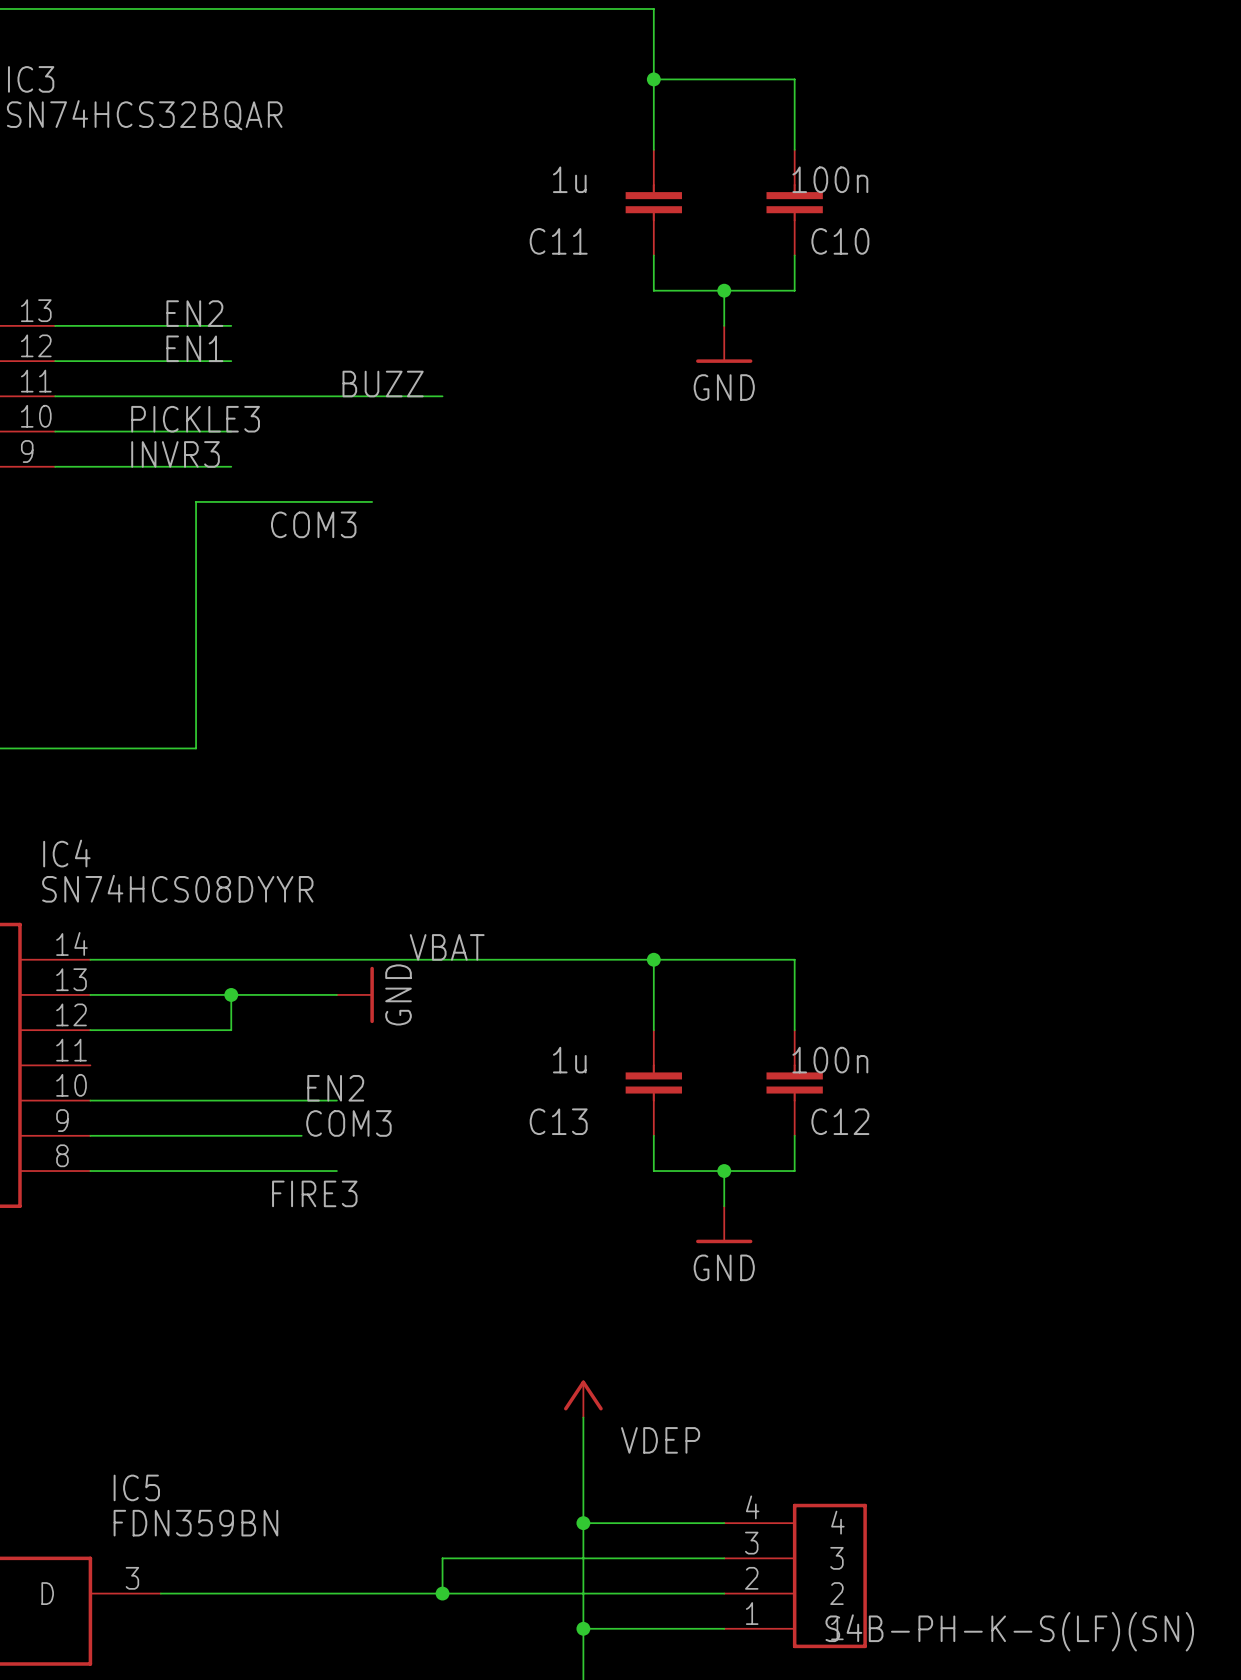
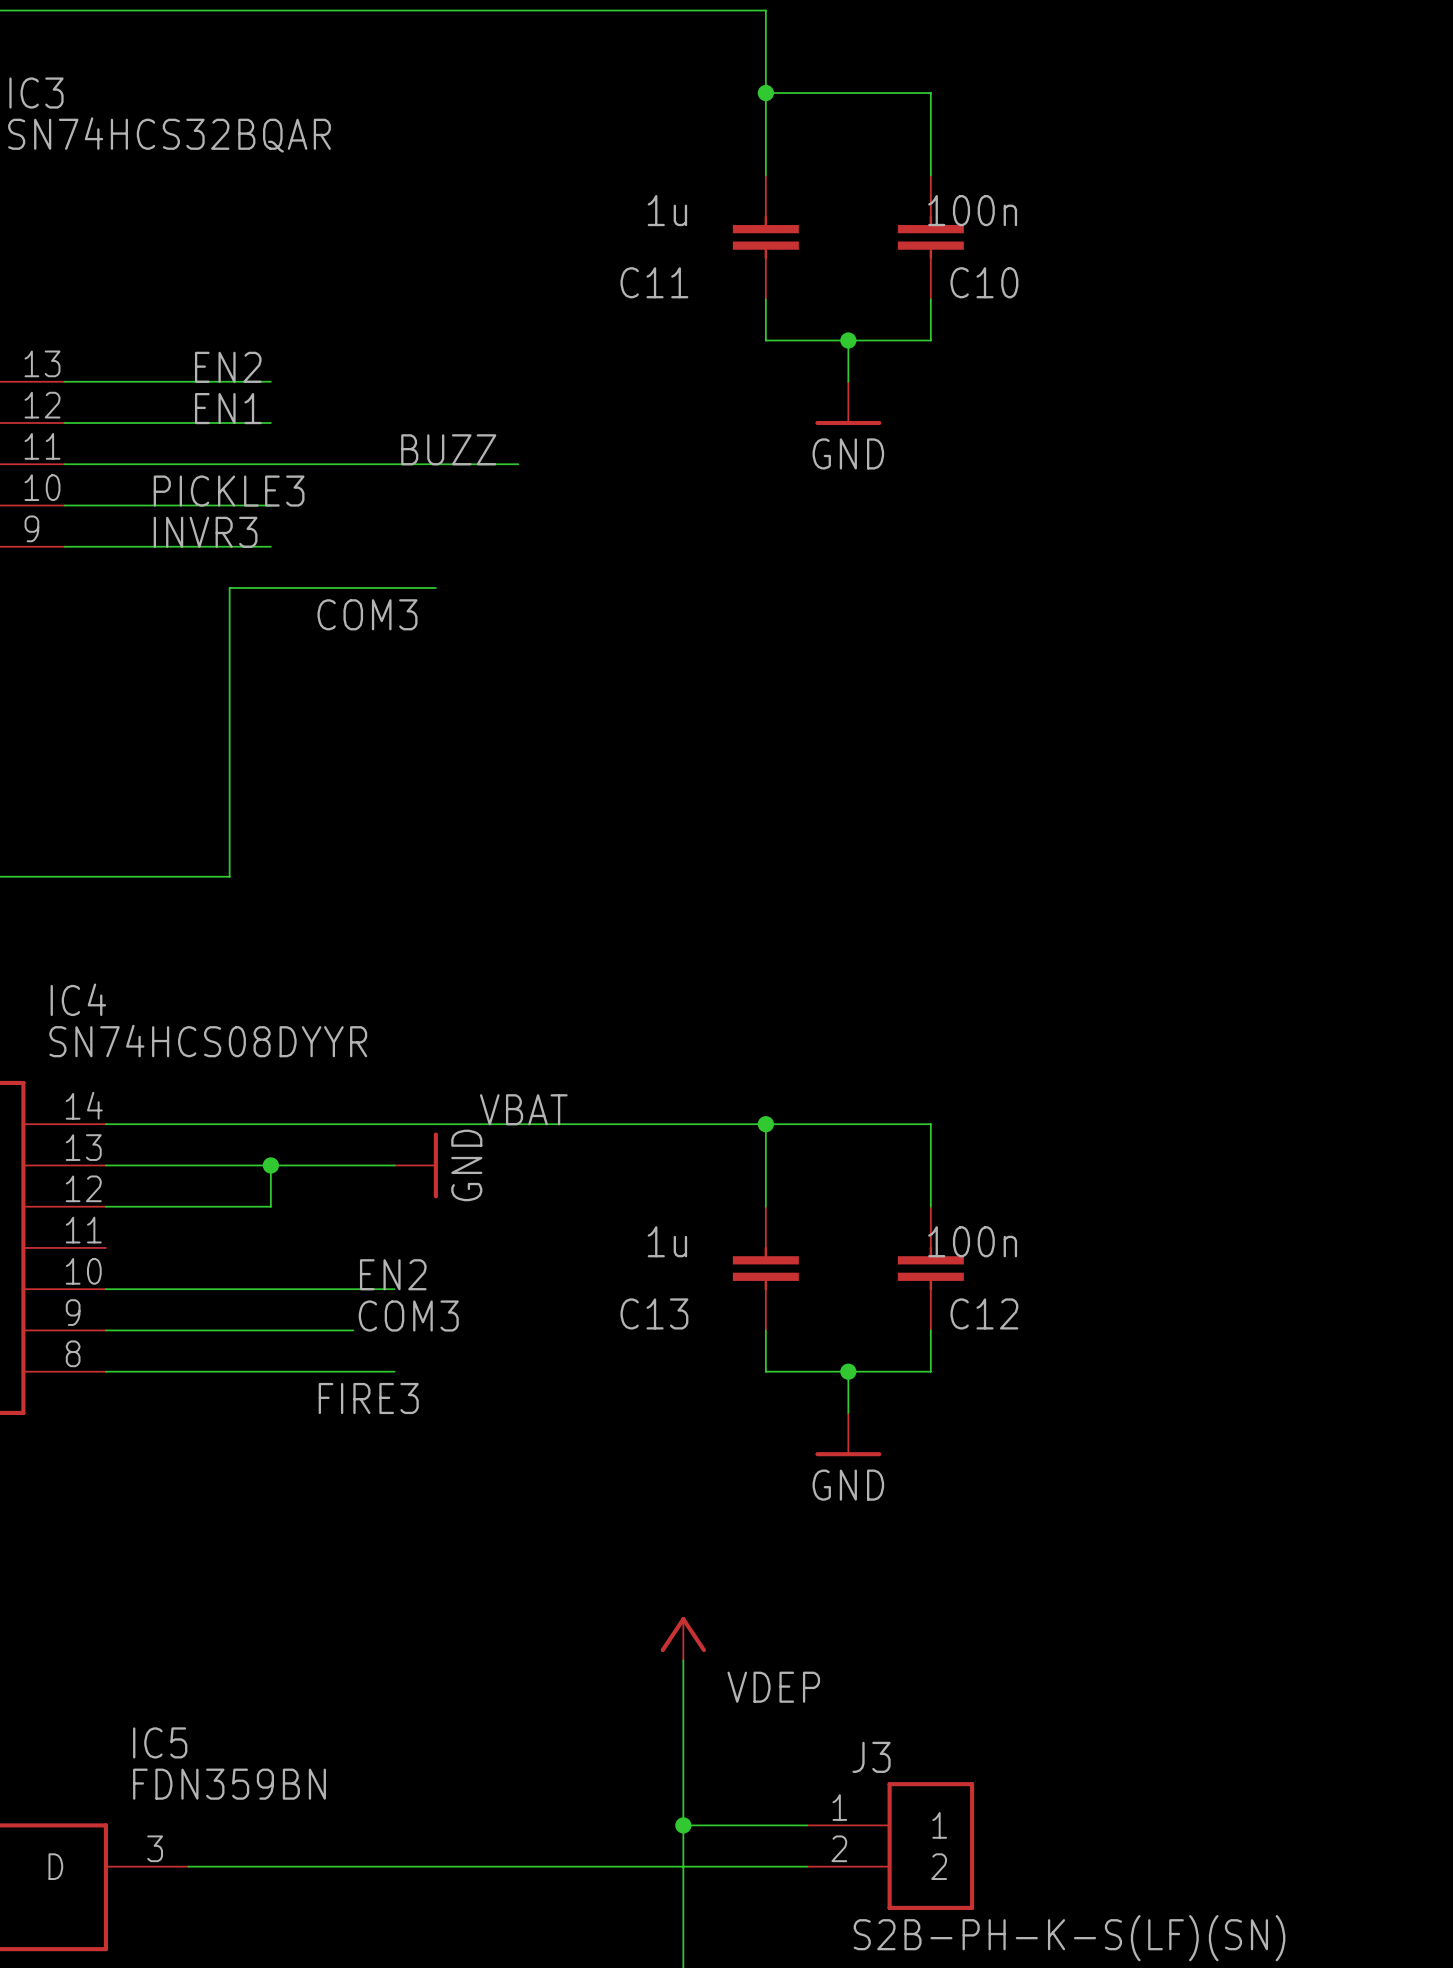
wire: (583, 1523) (724, 1523) -> none
junction: (583, 1523) -> none
wire: (583, 1558) (442, 1558) (442, 1593) -> none
junction: none -> (683, 1825)
J3: none -> S2B-PH-K-S(LF)(SN) (890, 1846)
part: S4B-PH-K-S(LF)(SN) (795, 1575) -> none
junction: (442, 1593) -> none
wire: (583, 1628) (724, 1628) -> none
junction: (583, 1628) -> none

